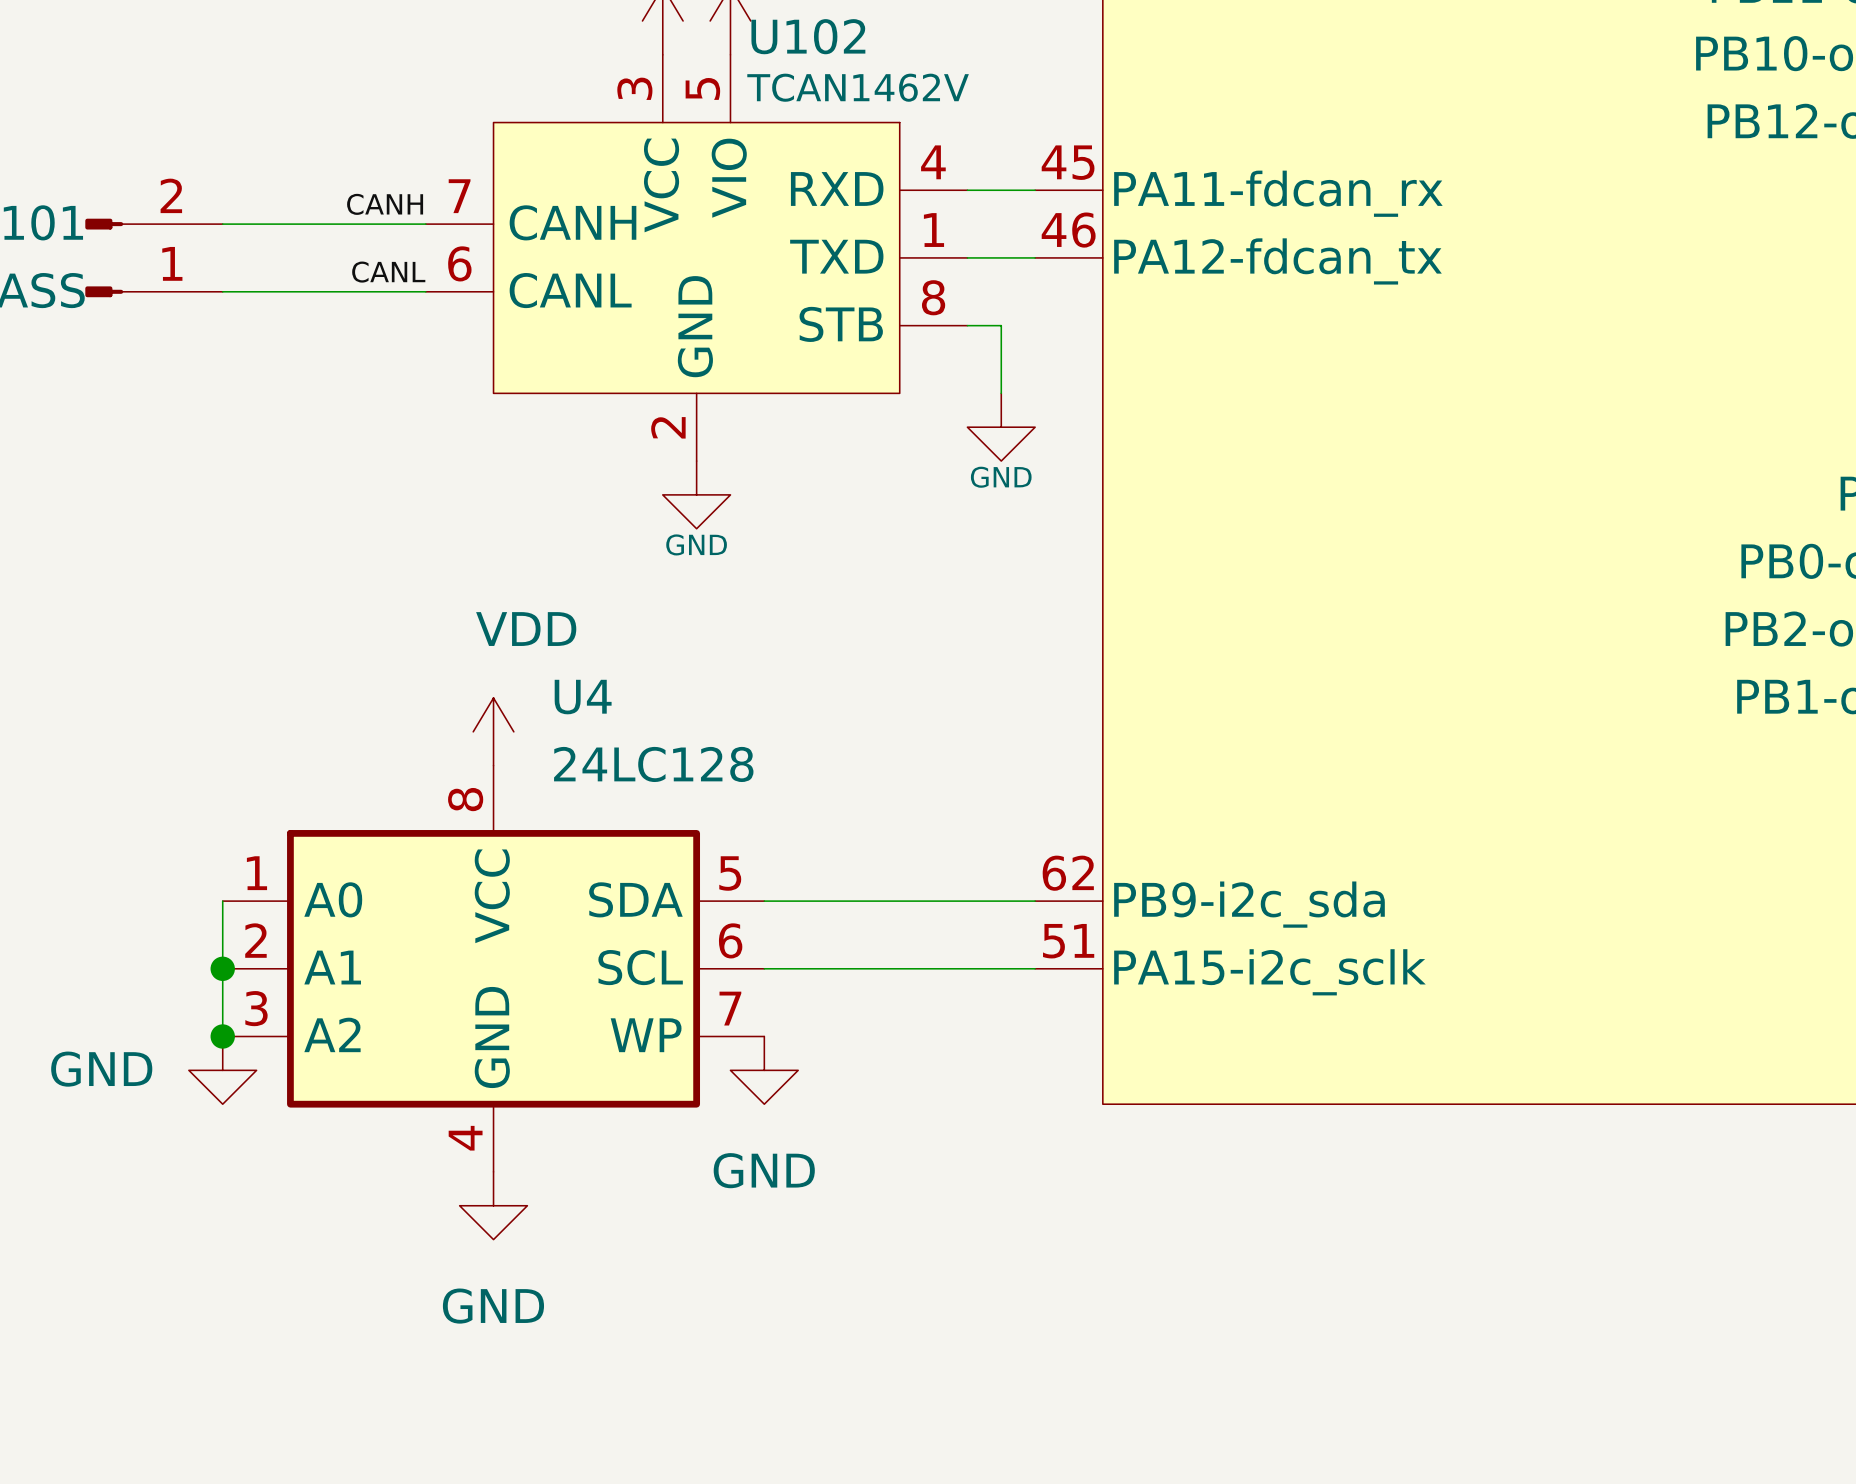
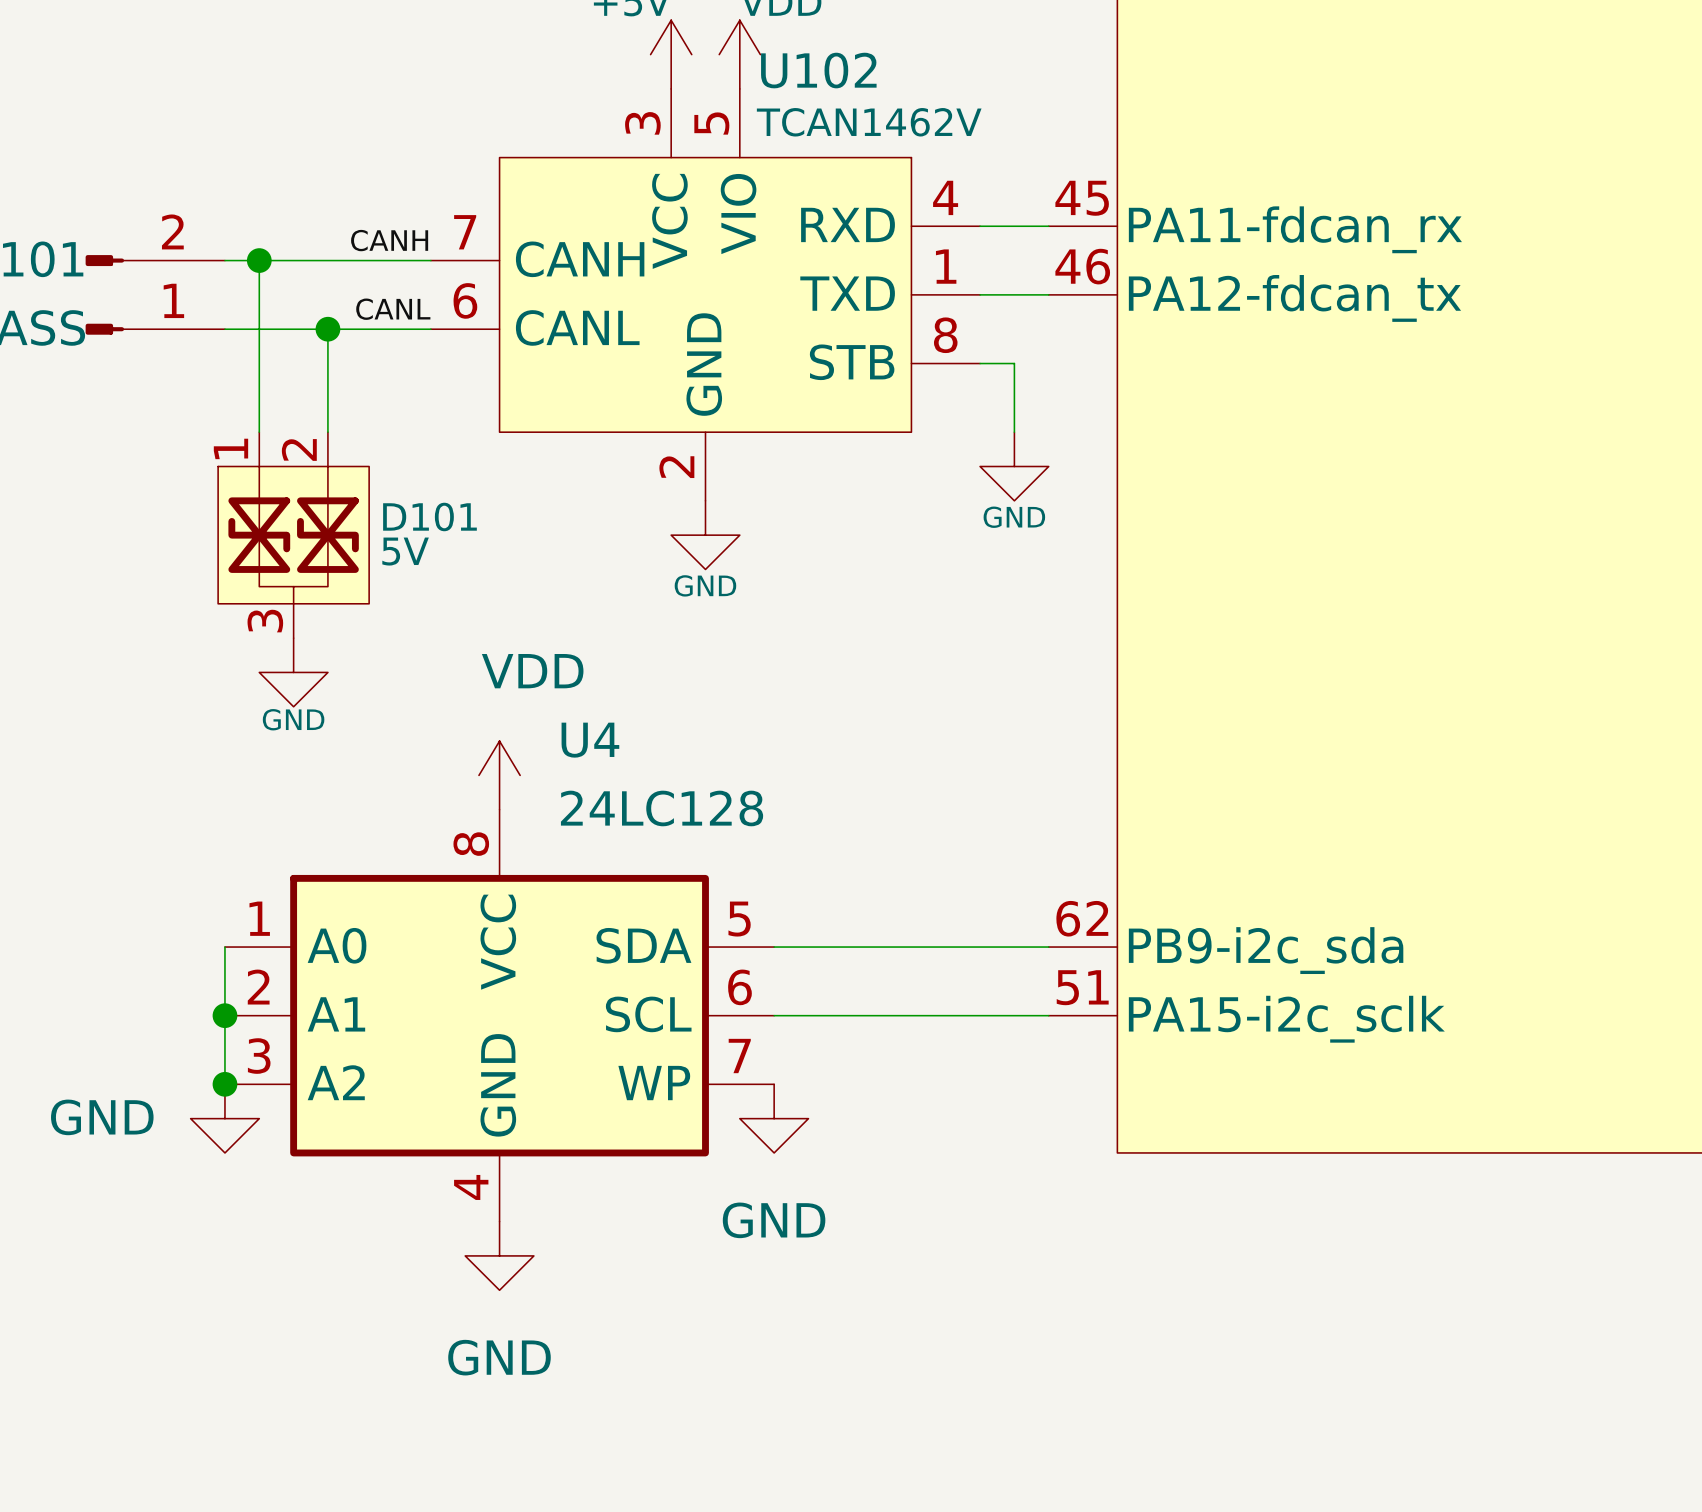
wire: none -> (259, 260) (259, 432)
junction: none -> (259, 260)
wire: none -> (327, 329) (327, 432)
junction: none -> (327, 329)
D101: none -> 5V (293, 535)
power symbol: none -> GND (293, 672)

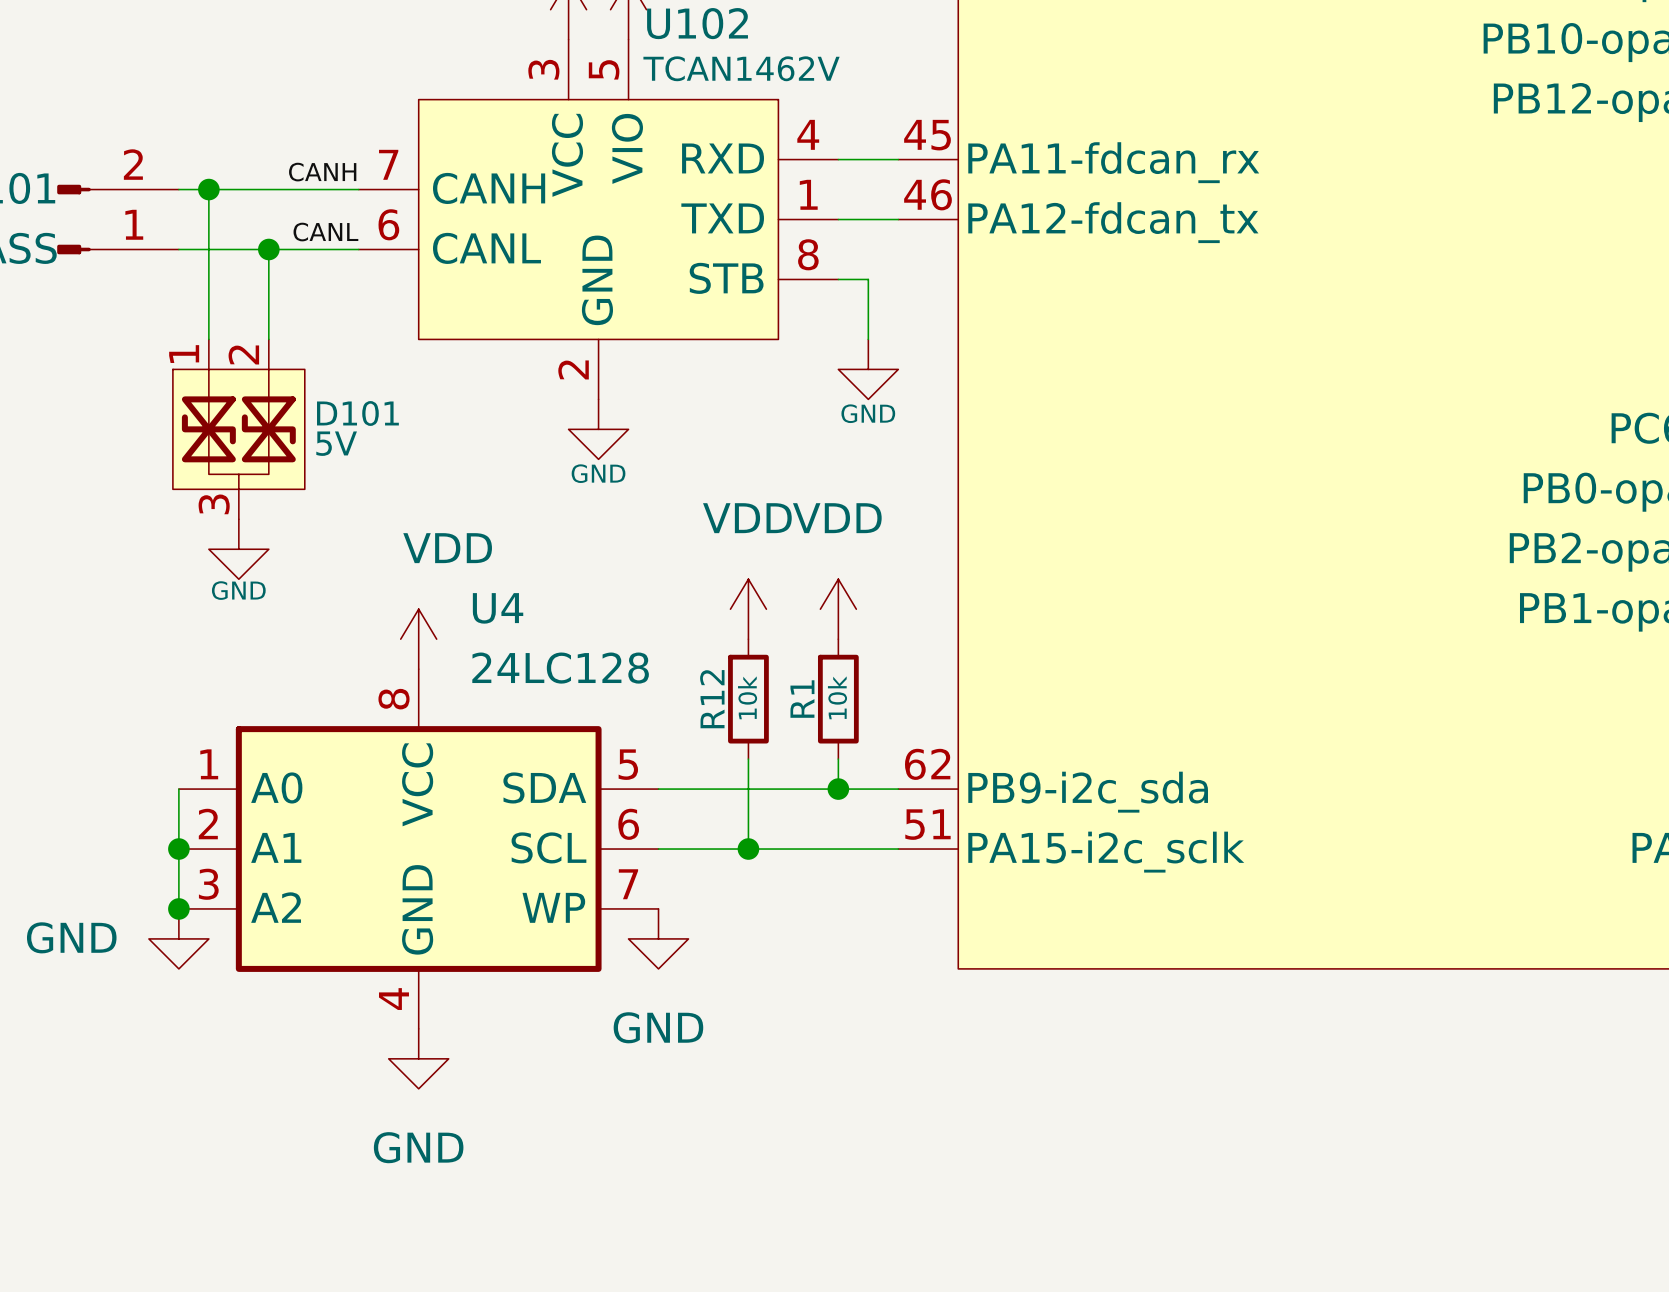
power symbol: none -> VDD (748, 609)
power symbol: none -> VDD (838, 609)
R12: none -> 10k (748, 699)
R1: none -> 10k (838, 699)
wire: none -> (748, 759) (748, 849)
wire: none -> (838, 759) (838, 789)
junction: none -> (838, 789)
junction: none -> (748, 849)

